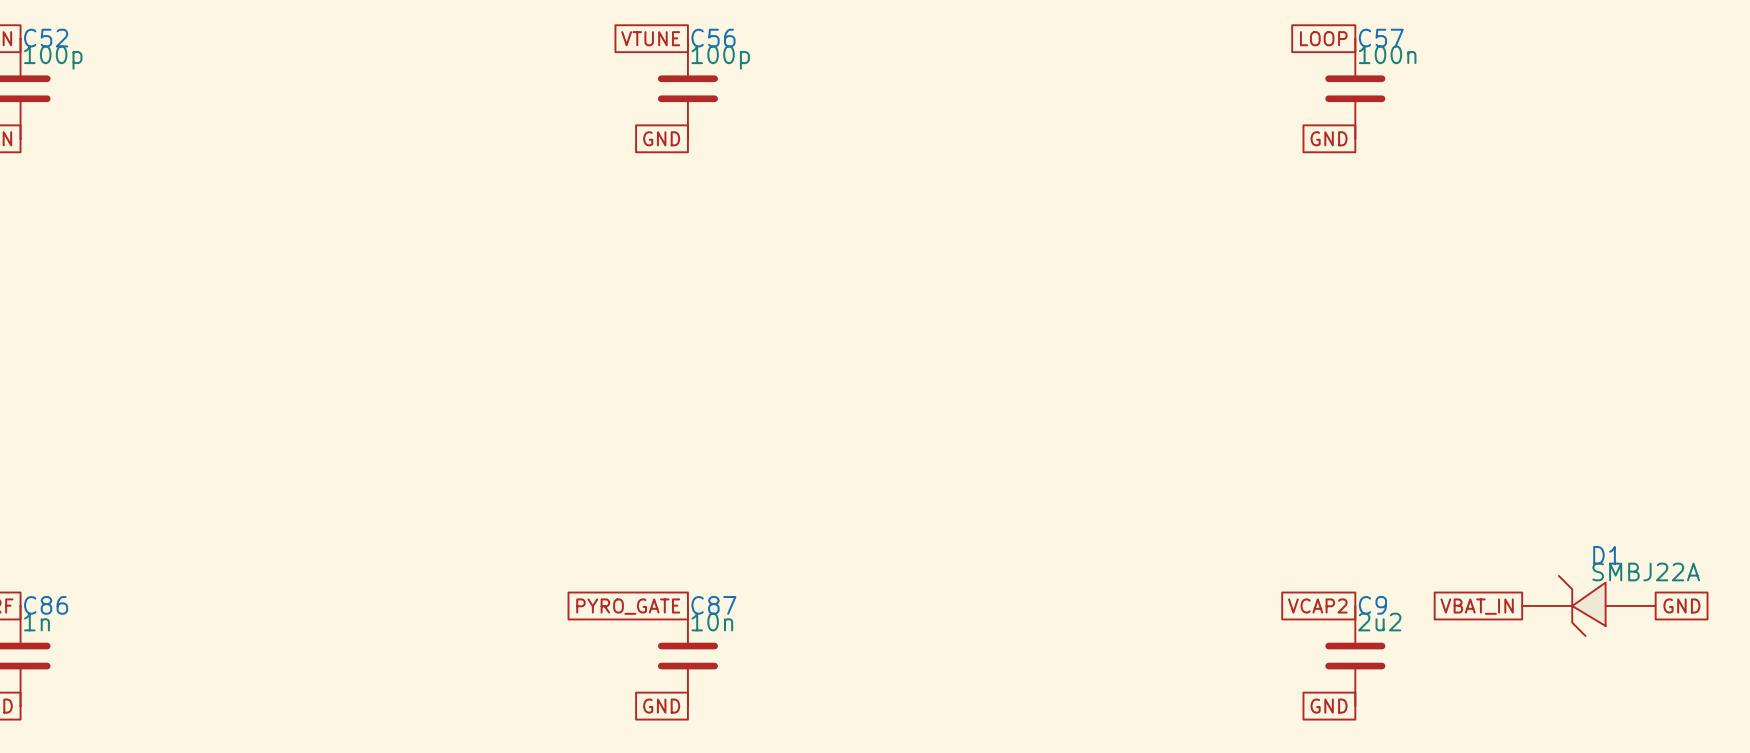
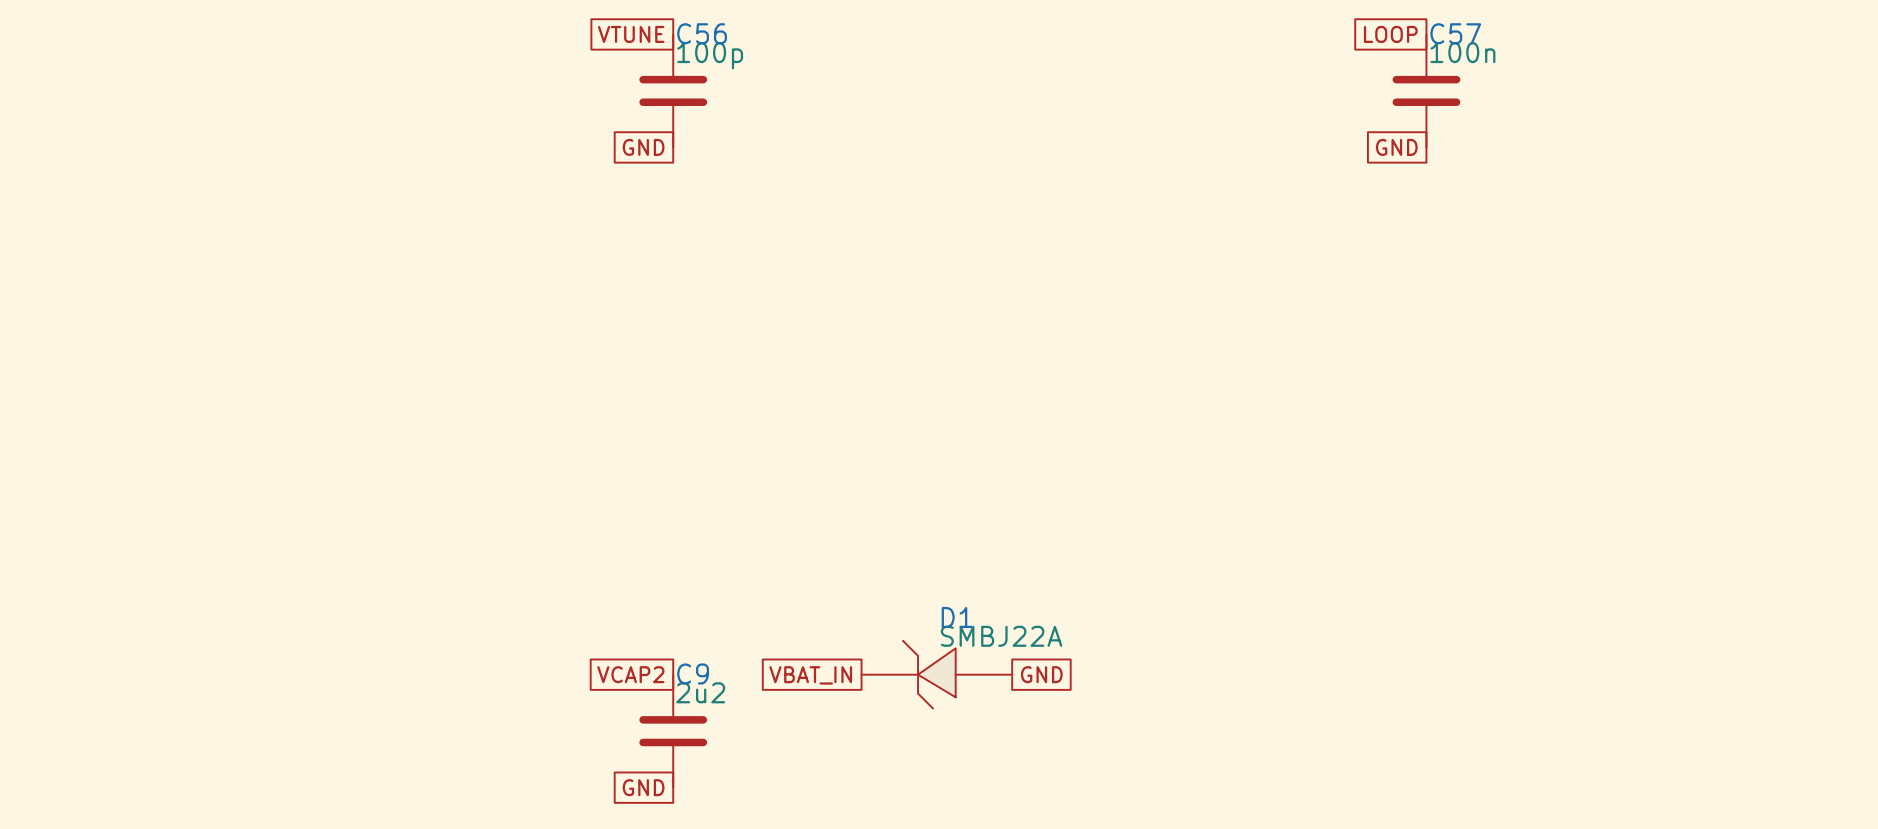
C87 name: C87 (713, 605) -> C9 (693, 673)
global label: none -> GND (1041, 674)
global label: VCAP2 (1317, 605) -> none
D1 position: (1588, 605) -> (936, 674)
global label: GND (1681, 605) -> none
global label: PYRO_GATE (628, 606) -> VCAP2 (630, 674)
global label: none -> VBAT_IN (810, 675)
global label: VBAT_IN (1477, 606) -> none
C87 value: 10n (712, 622) -> 2u2 (700, 692)
C9: 2u2 (1355, 656) -> none
global label: GND (1329, 706) -> none

